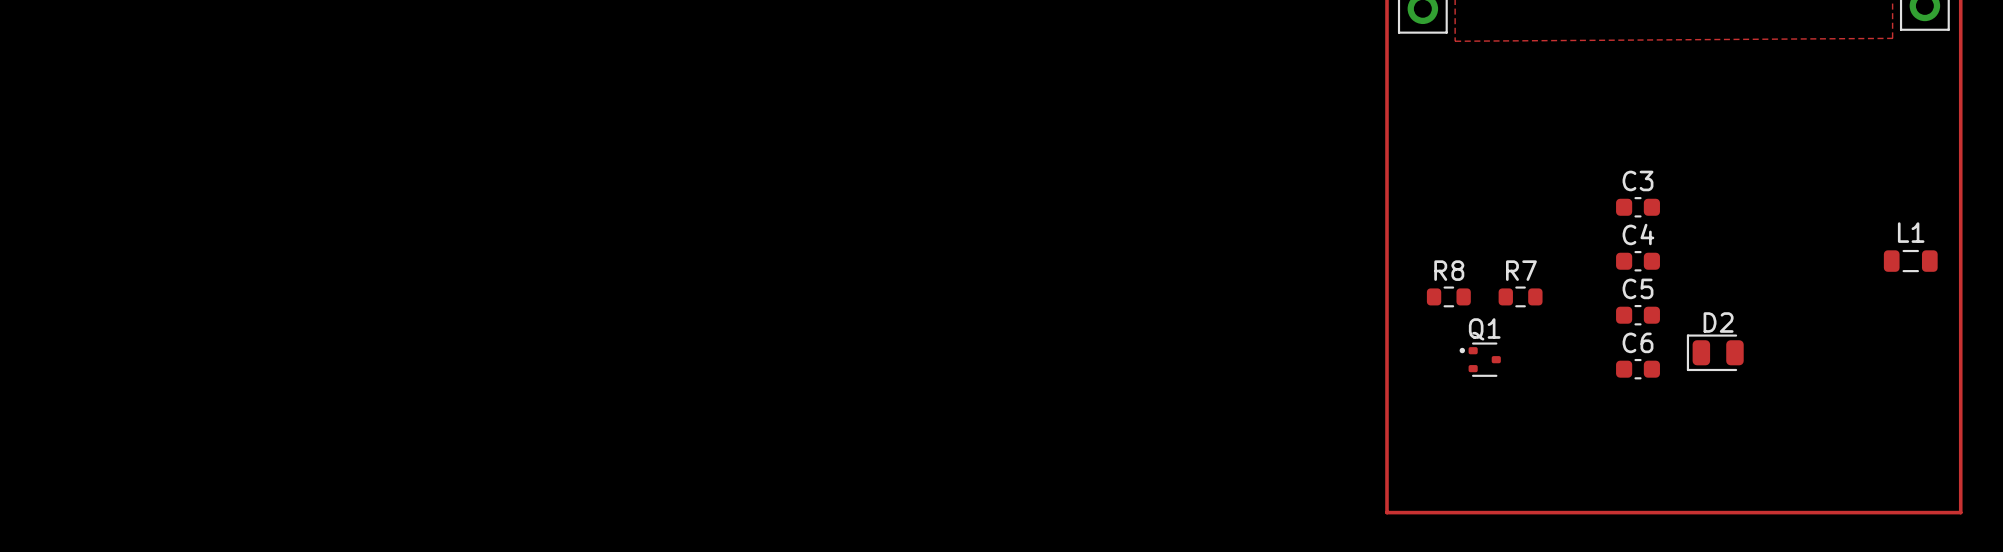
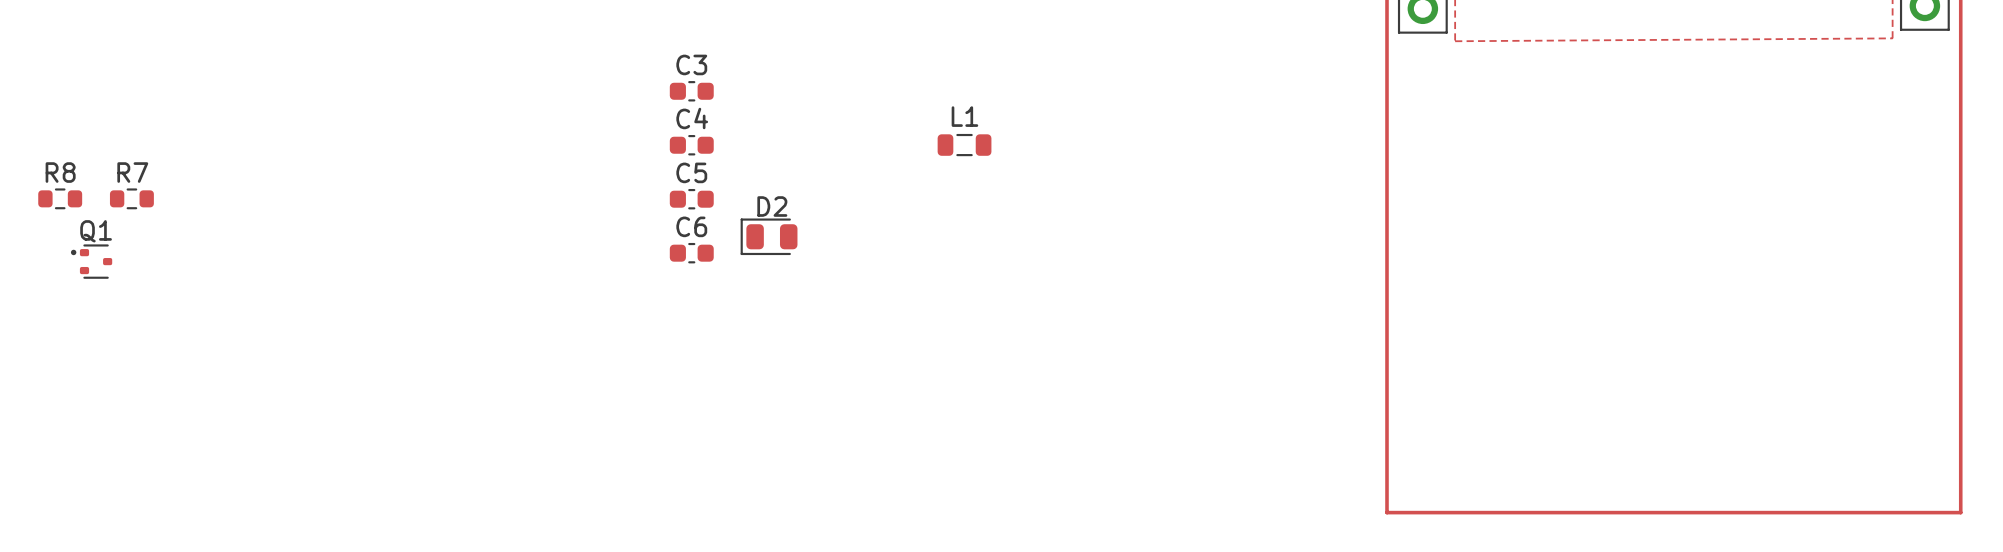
C3 position: (1638, 207) -> (691, 91)
C4 position: (1638, 261) -> (691, 145)
L1 position: (1910, 261) -> (964, 145)
R8 position: (1448, 296) -> (60, 198)
R7 position: (1520, 296) -> (131, 198)
C5 position: (1638, 315) -> (691, 199)
D2 position: (1715, 352) -> (769, 236)
Q1 position: (1480, 359) -> (91, 261)
C6 position: (1638, 369) -> (691, 253)

